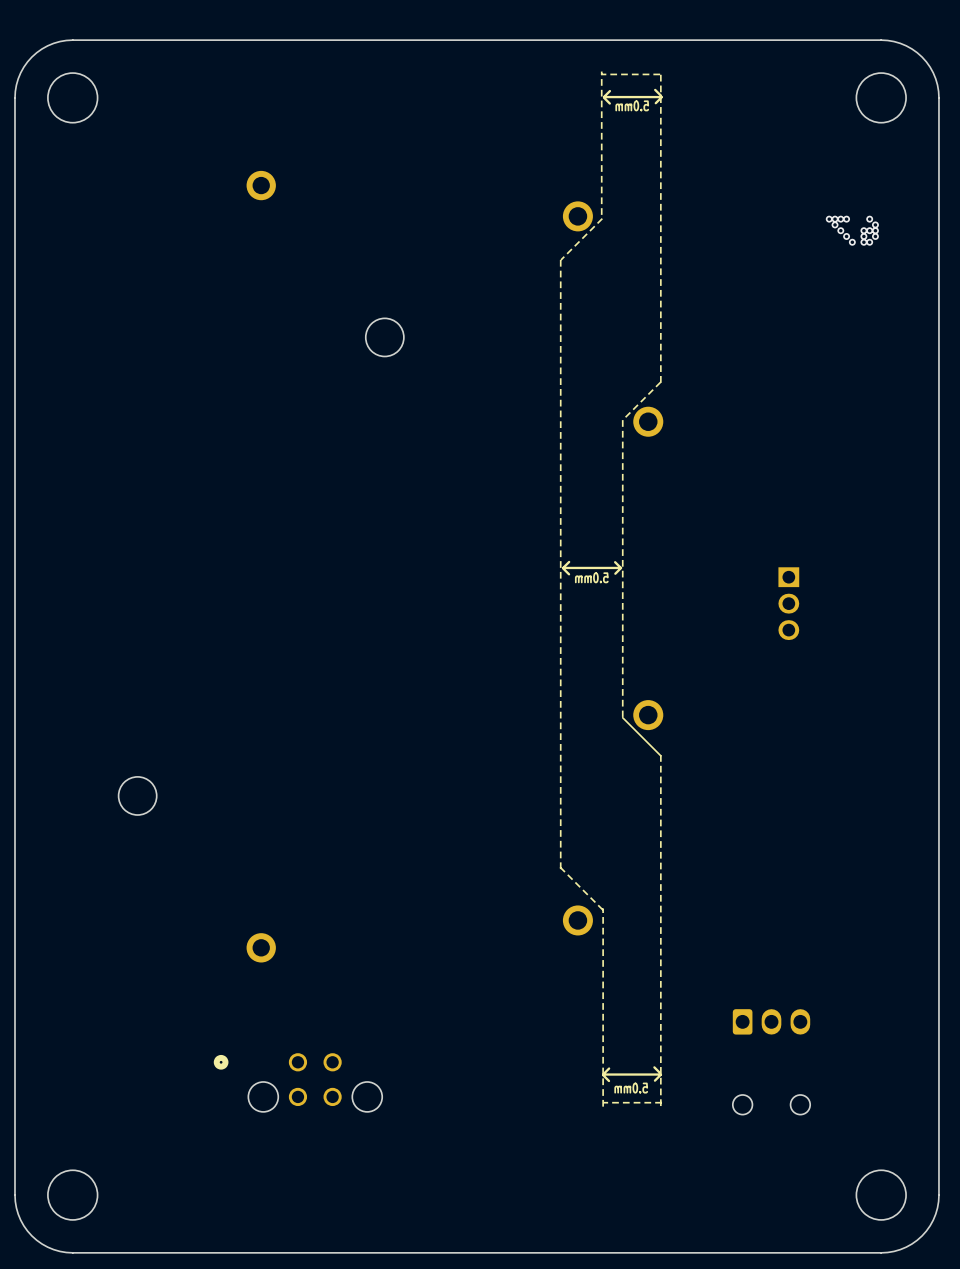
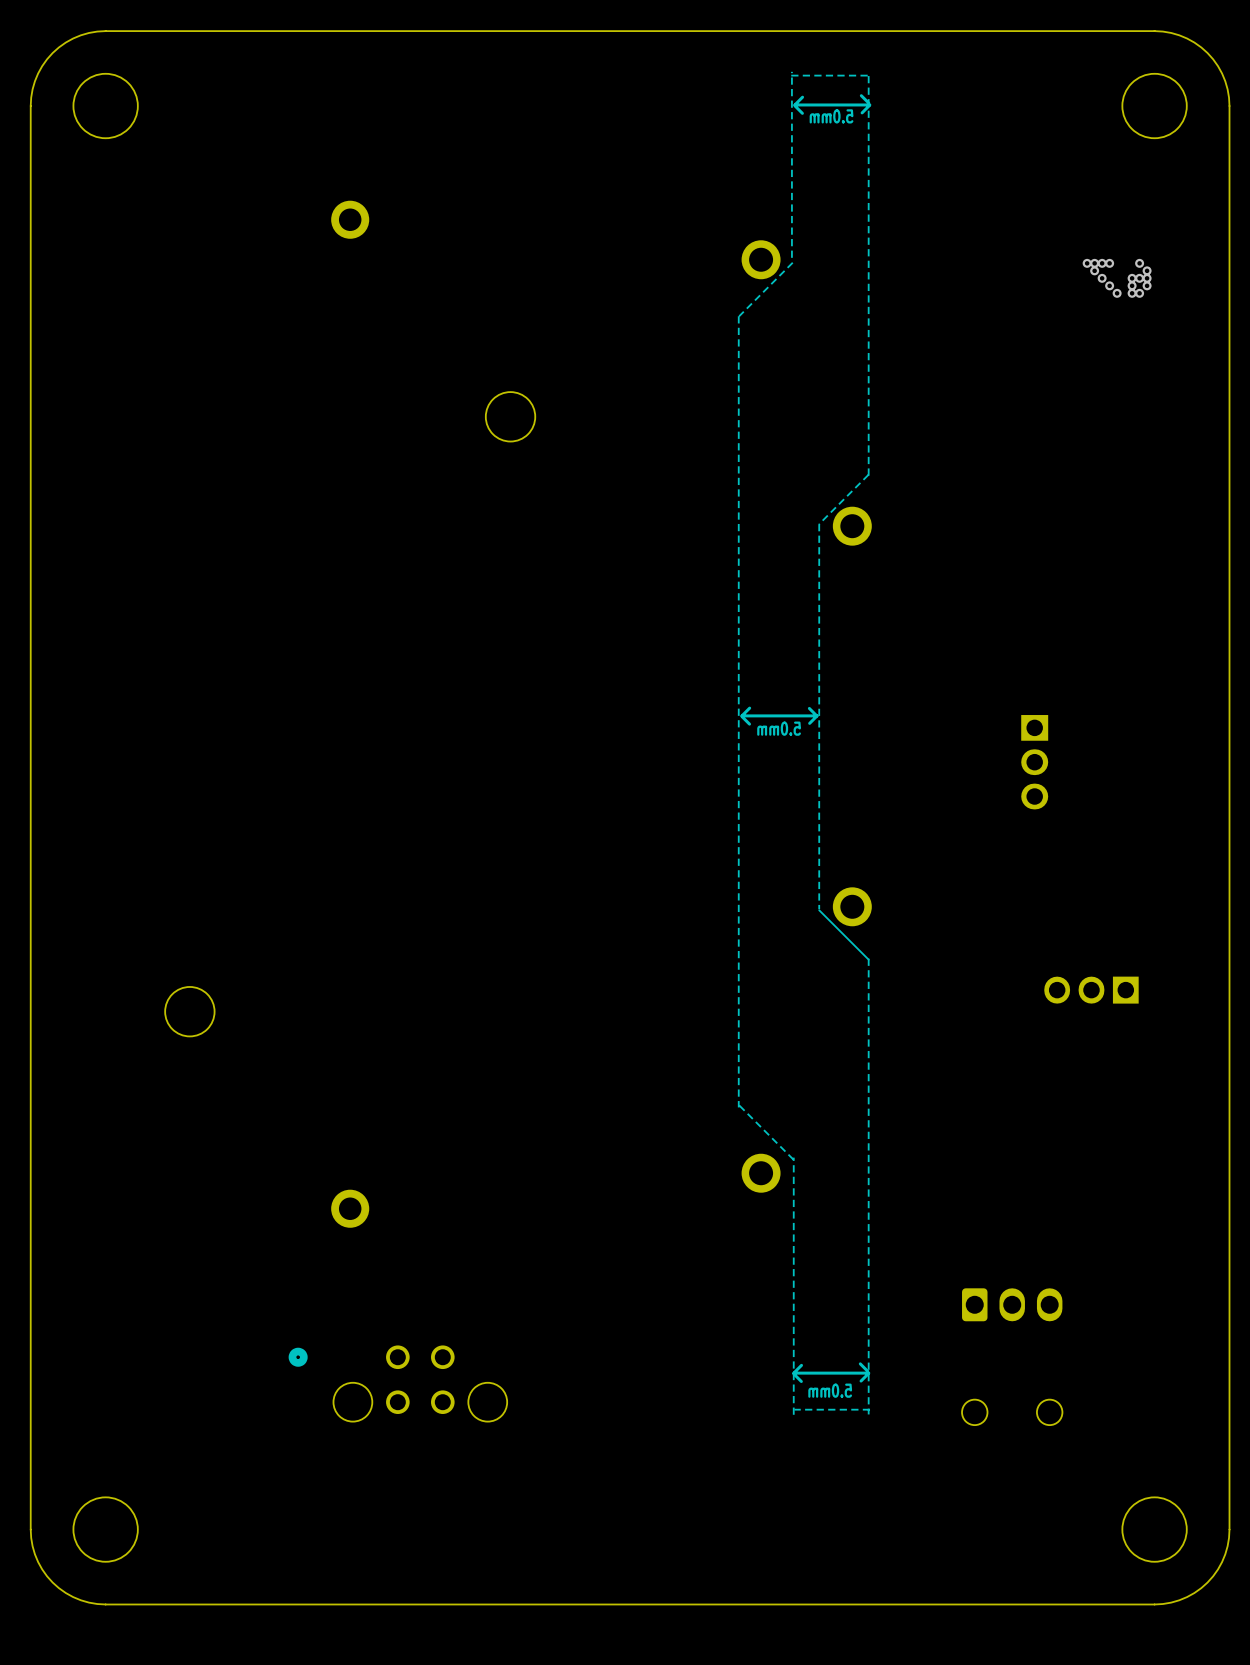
part: none -> (1091, 990)

